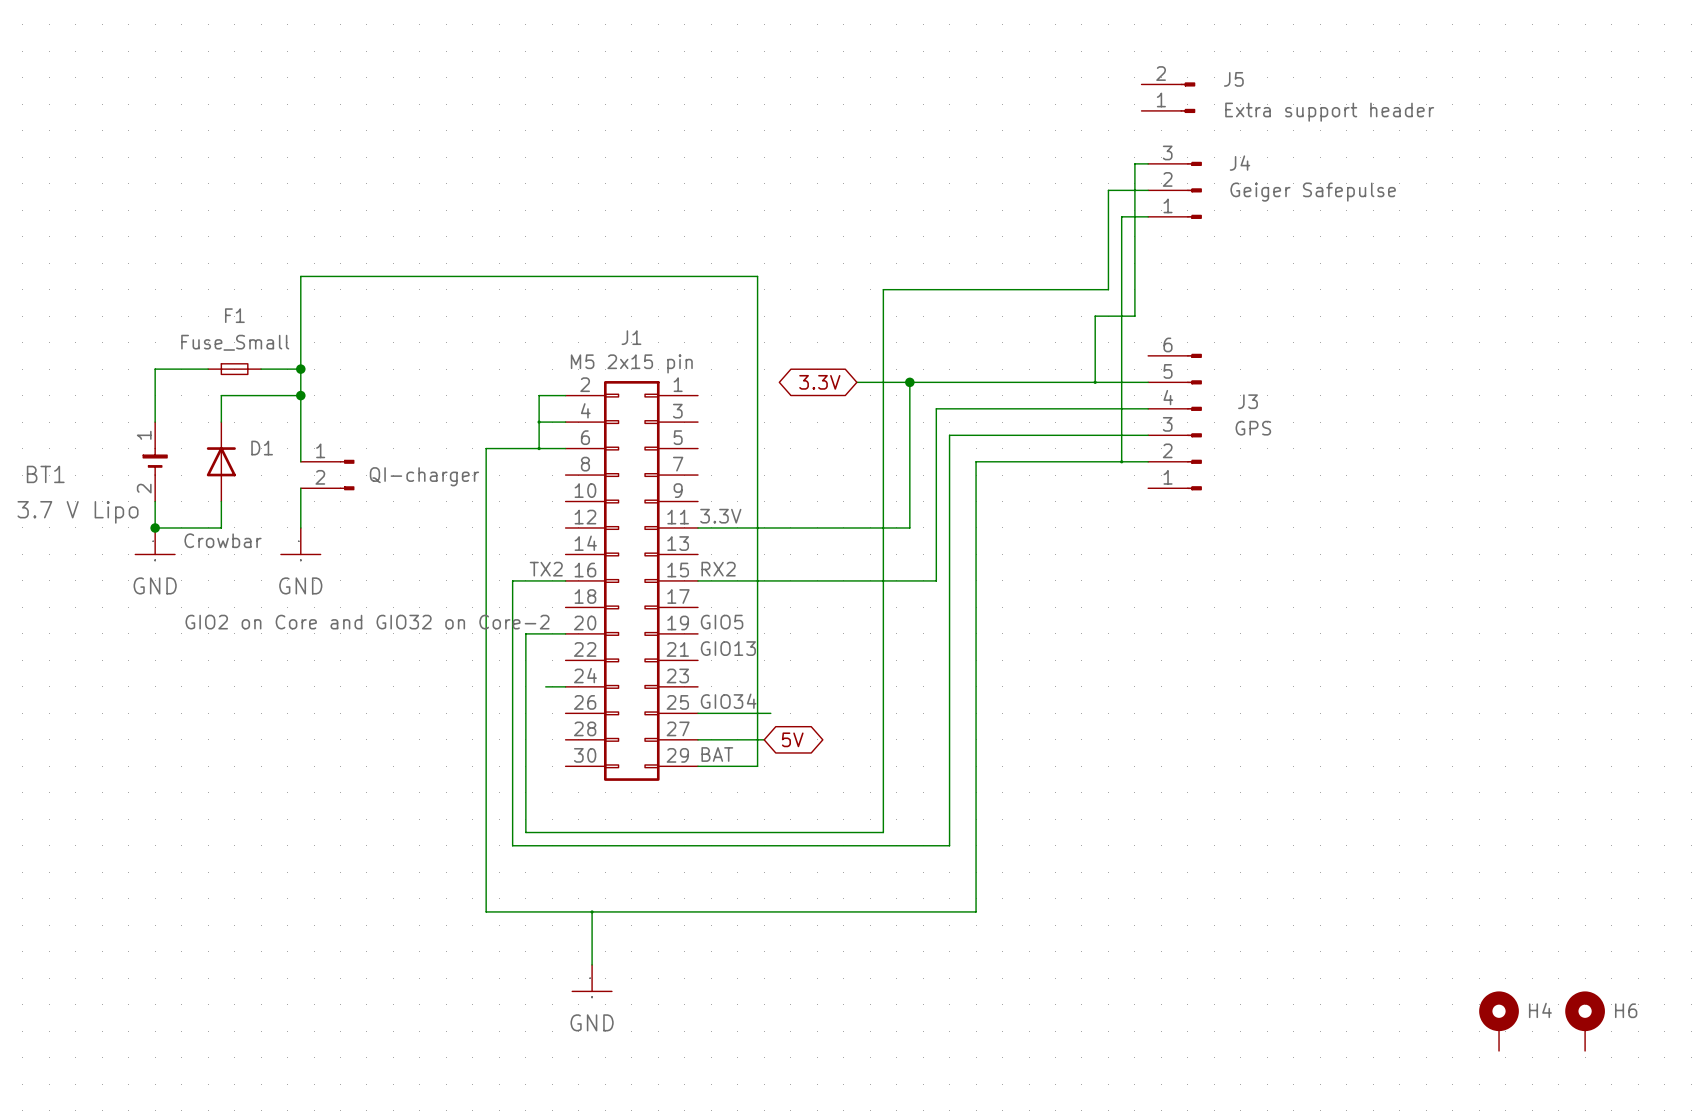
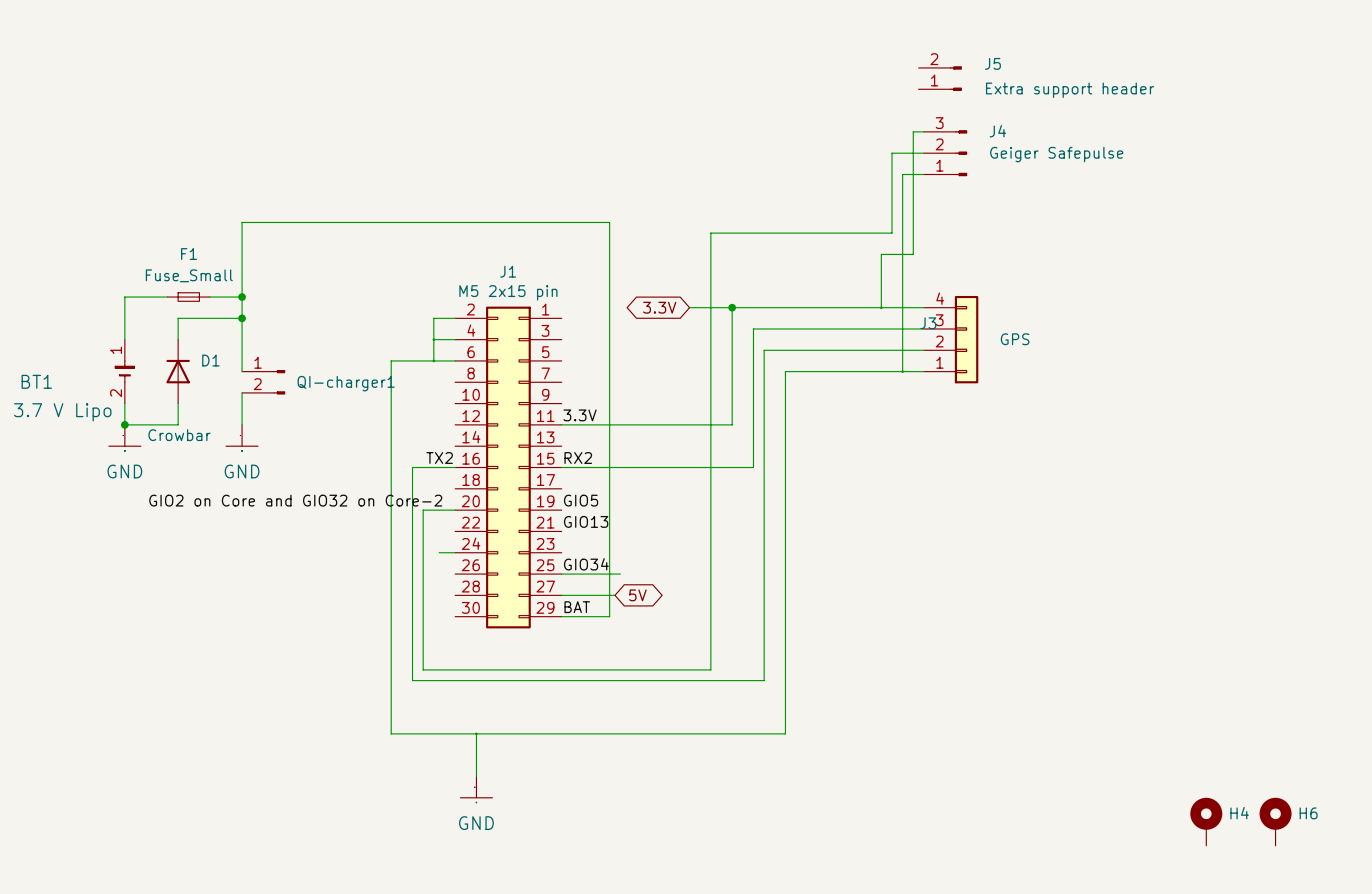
J3 symbol: [1148, 353, 1202, 491] -> [923, 295, 979, 384]
J3 name position: J3 (1247, 401) -> J3 (928, 323)
QI-charger name: QI-charger (424, 476) -> QI-charger1 (346, 383)

